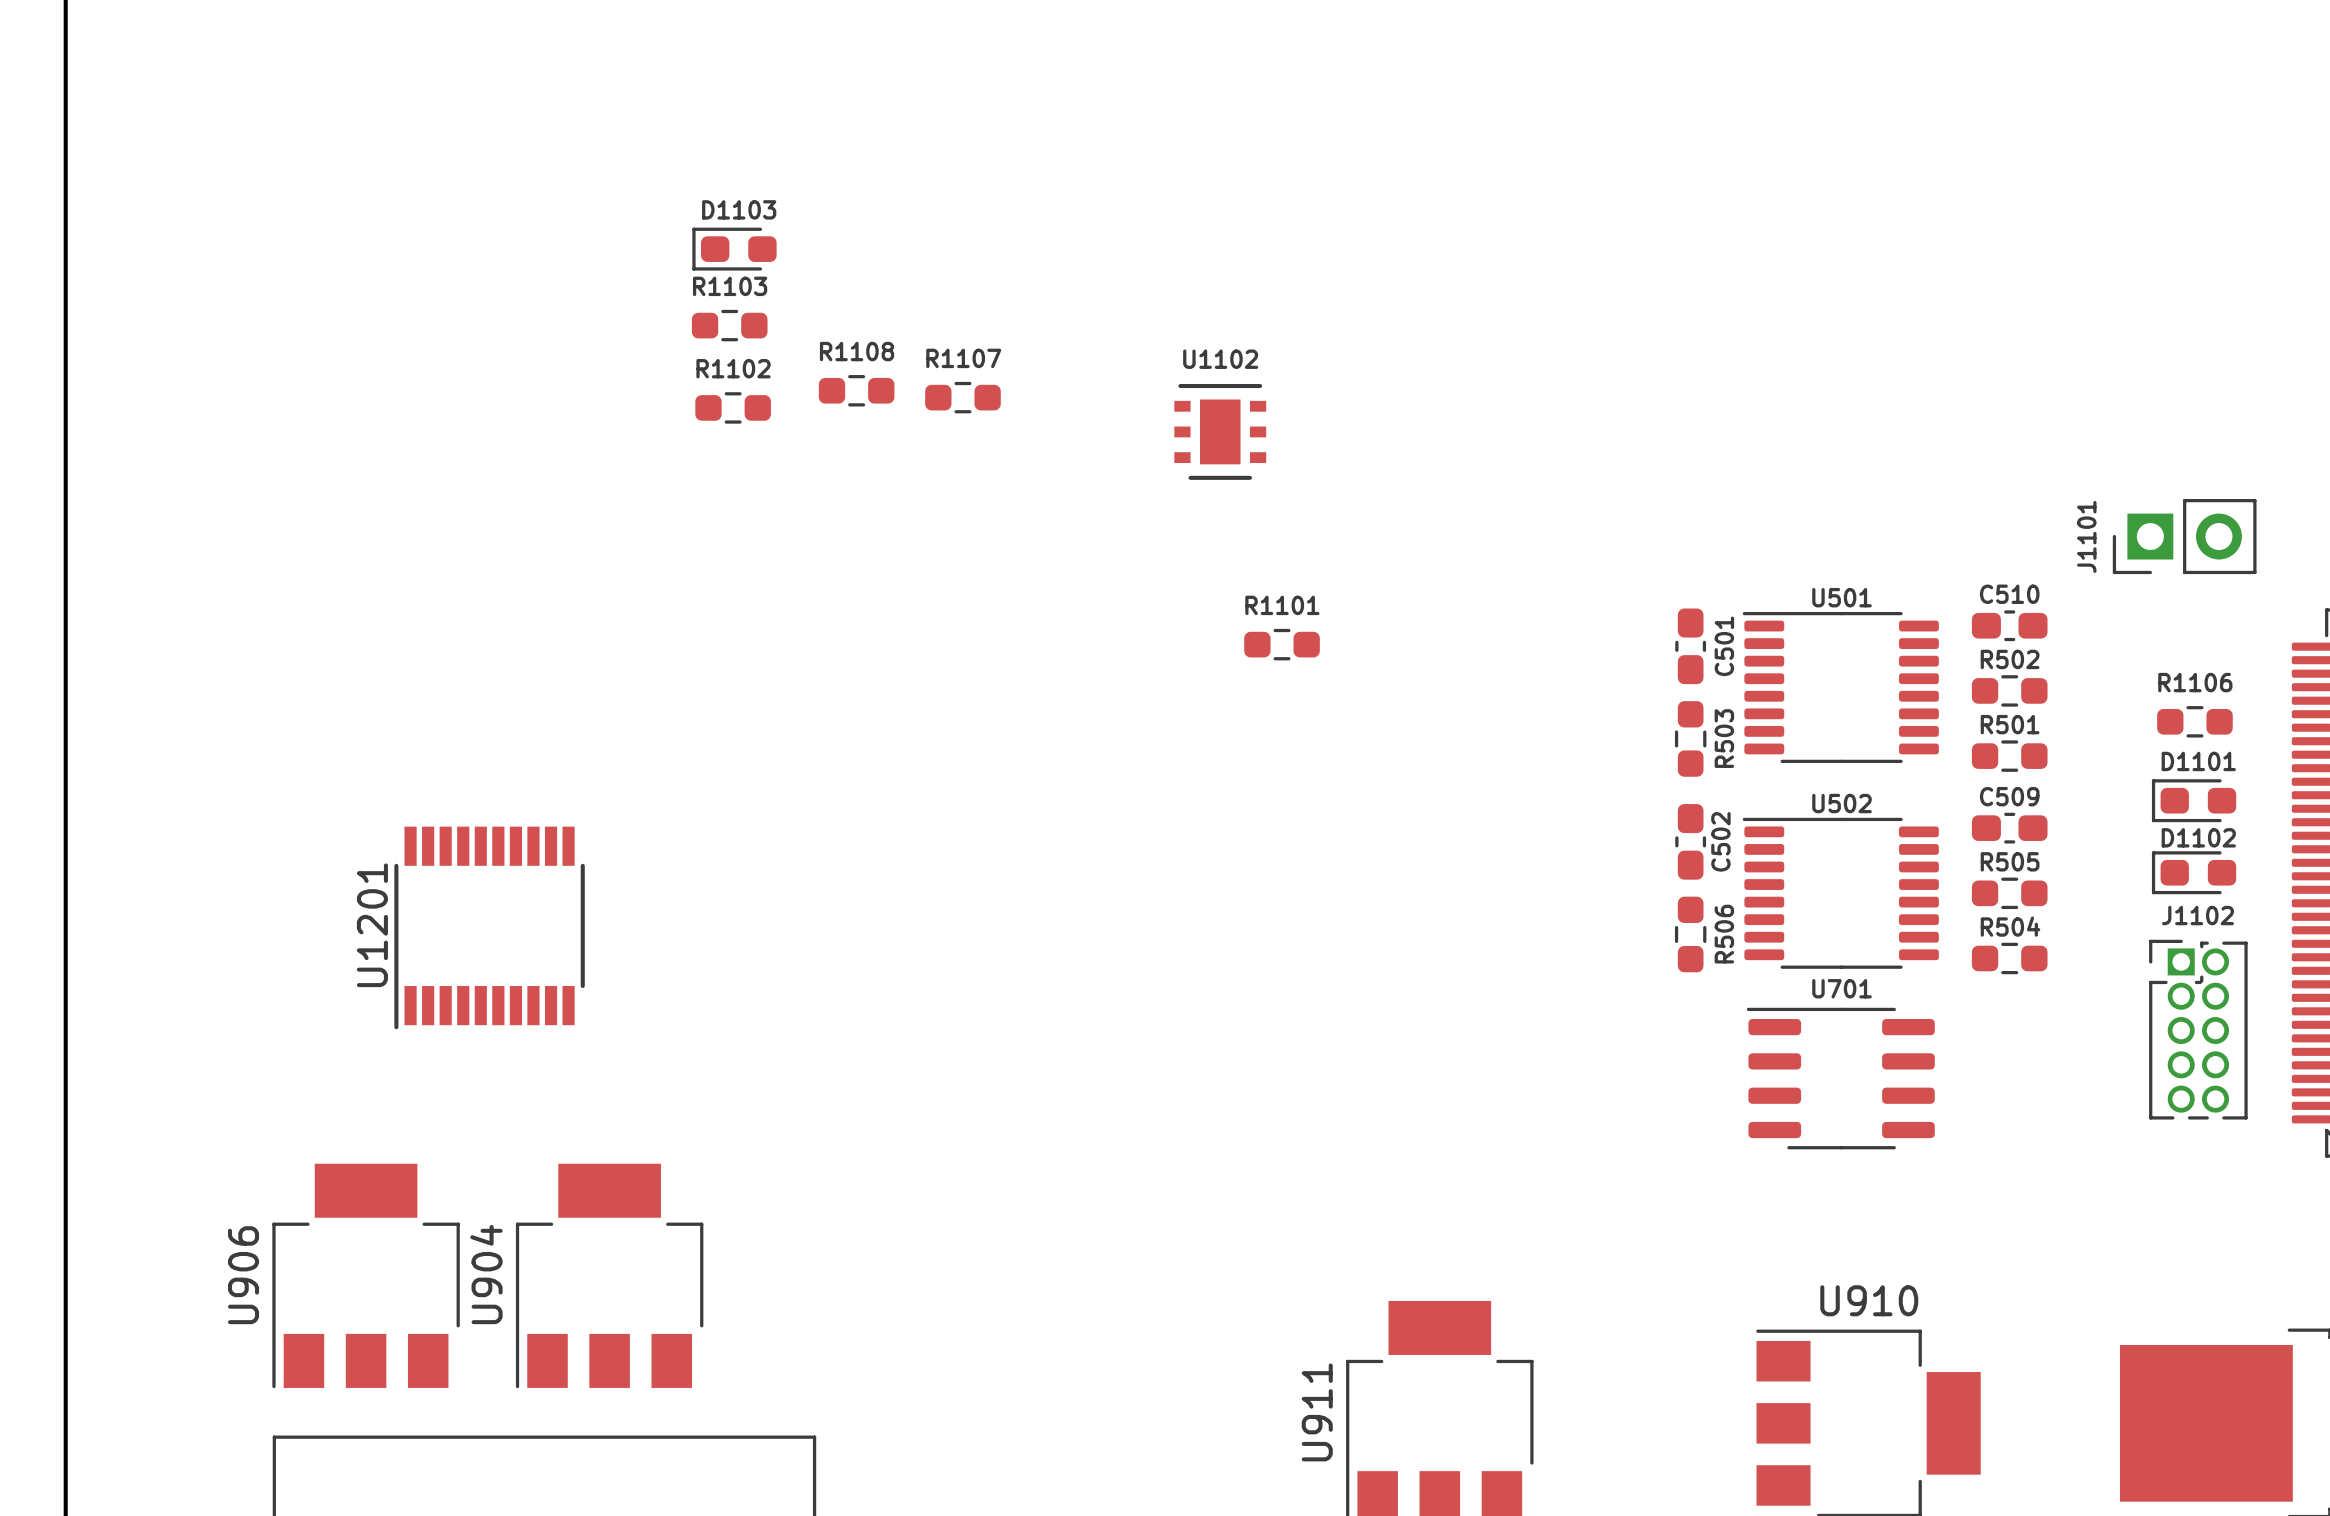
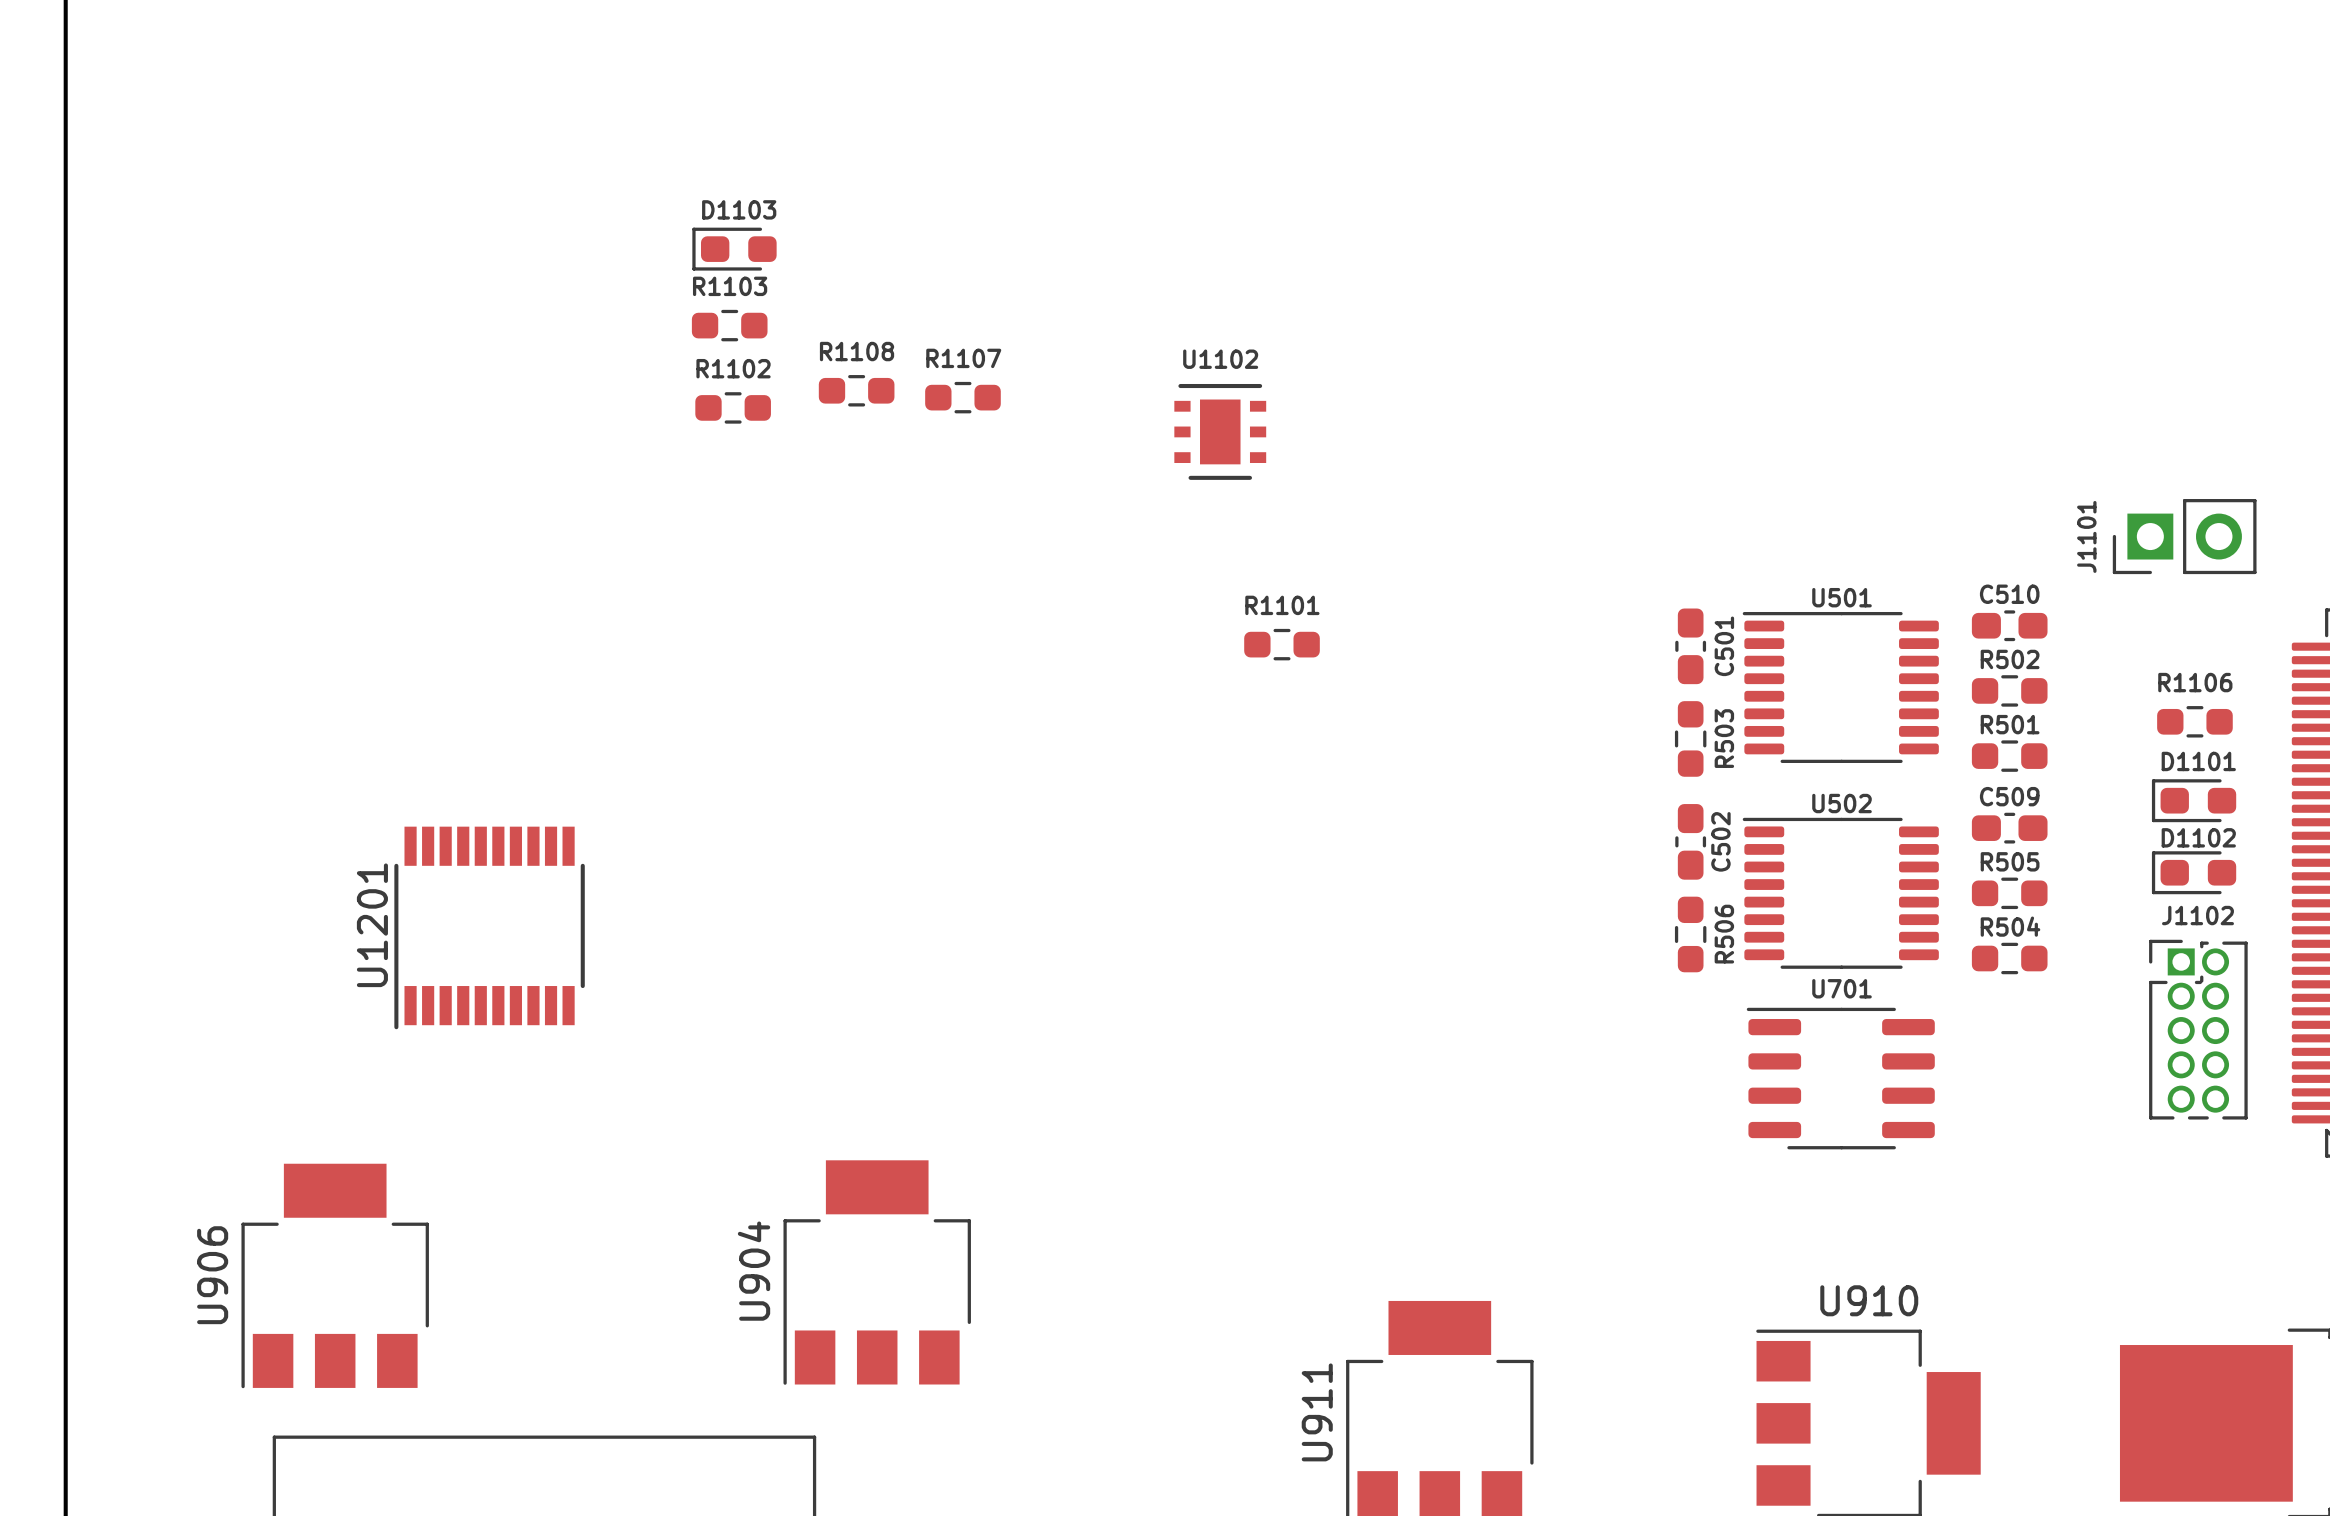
U906 position: (366, 1275) -> (335, 1275)
U904 position: (609, 1275) -> (877, 1272)

